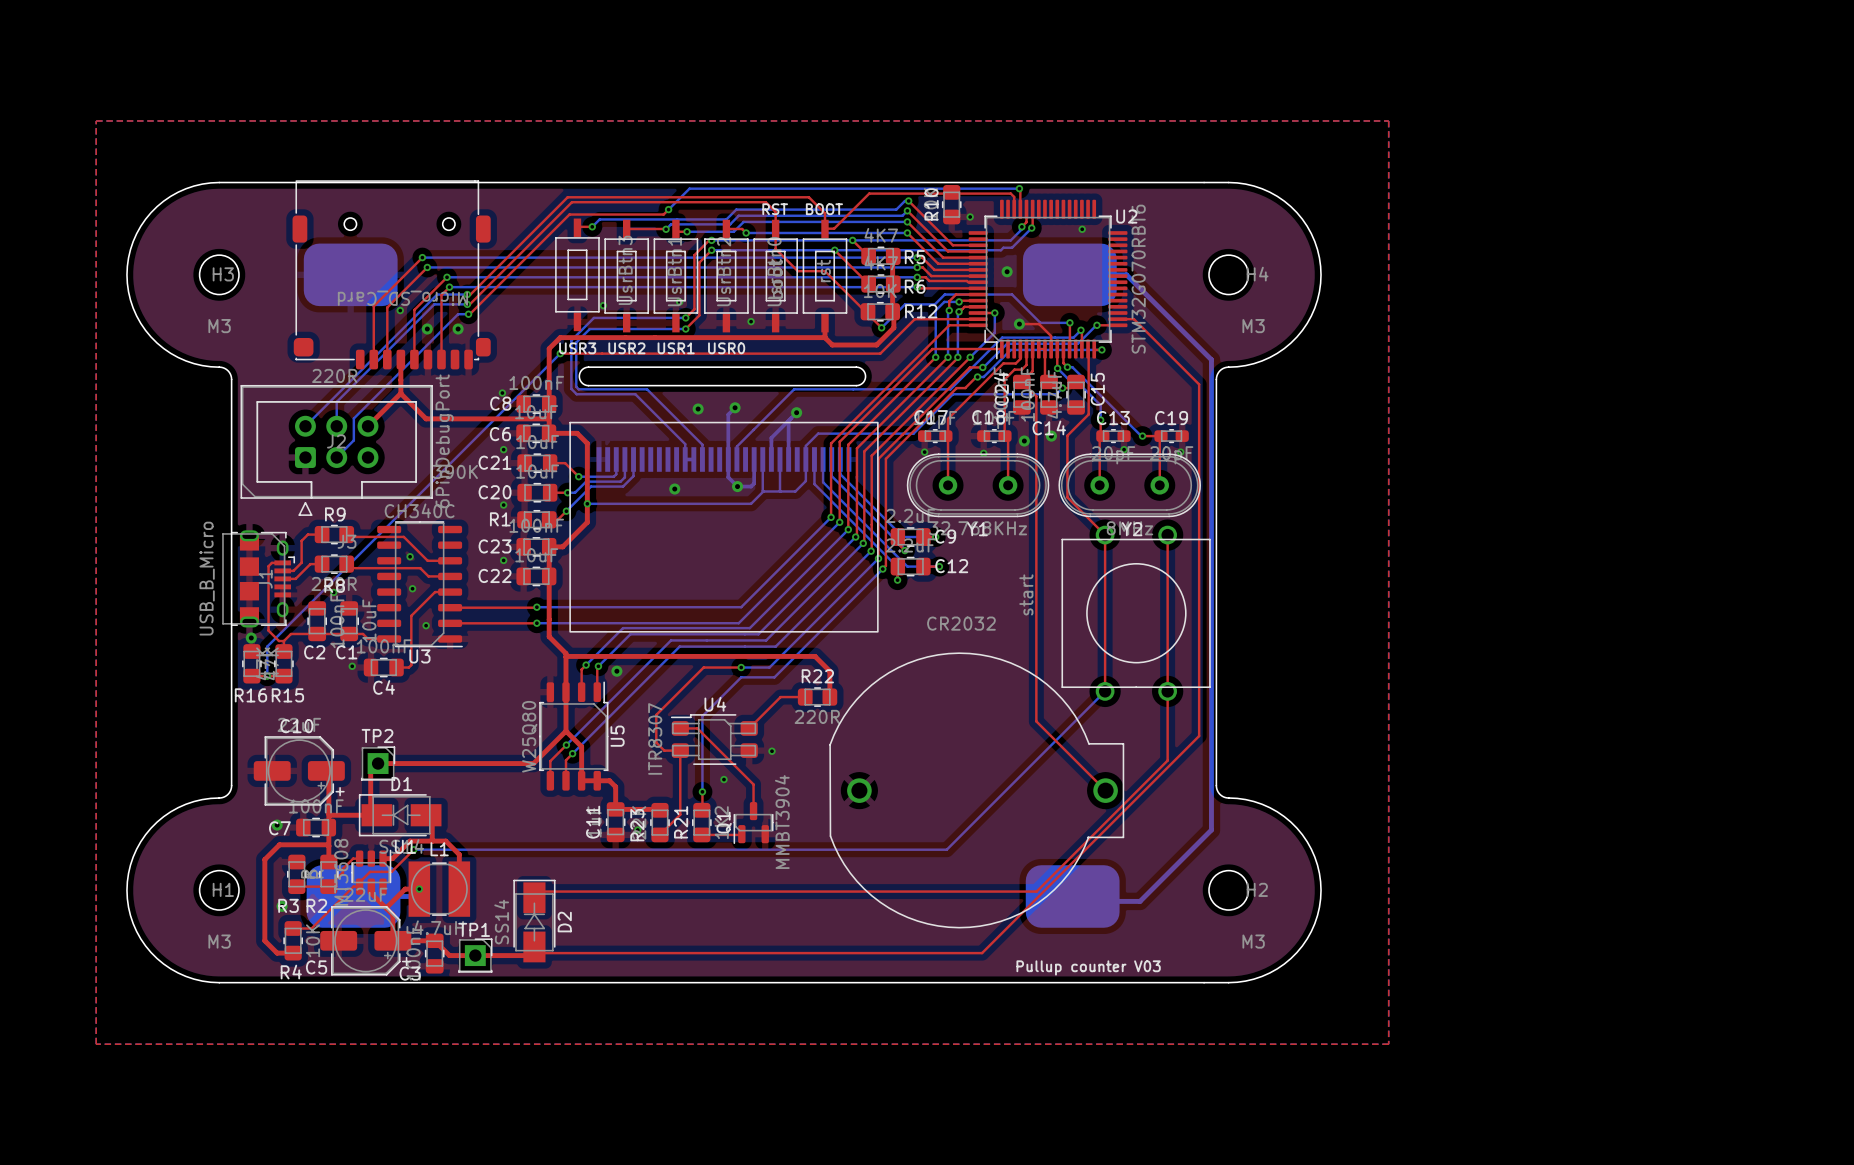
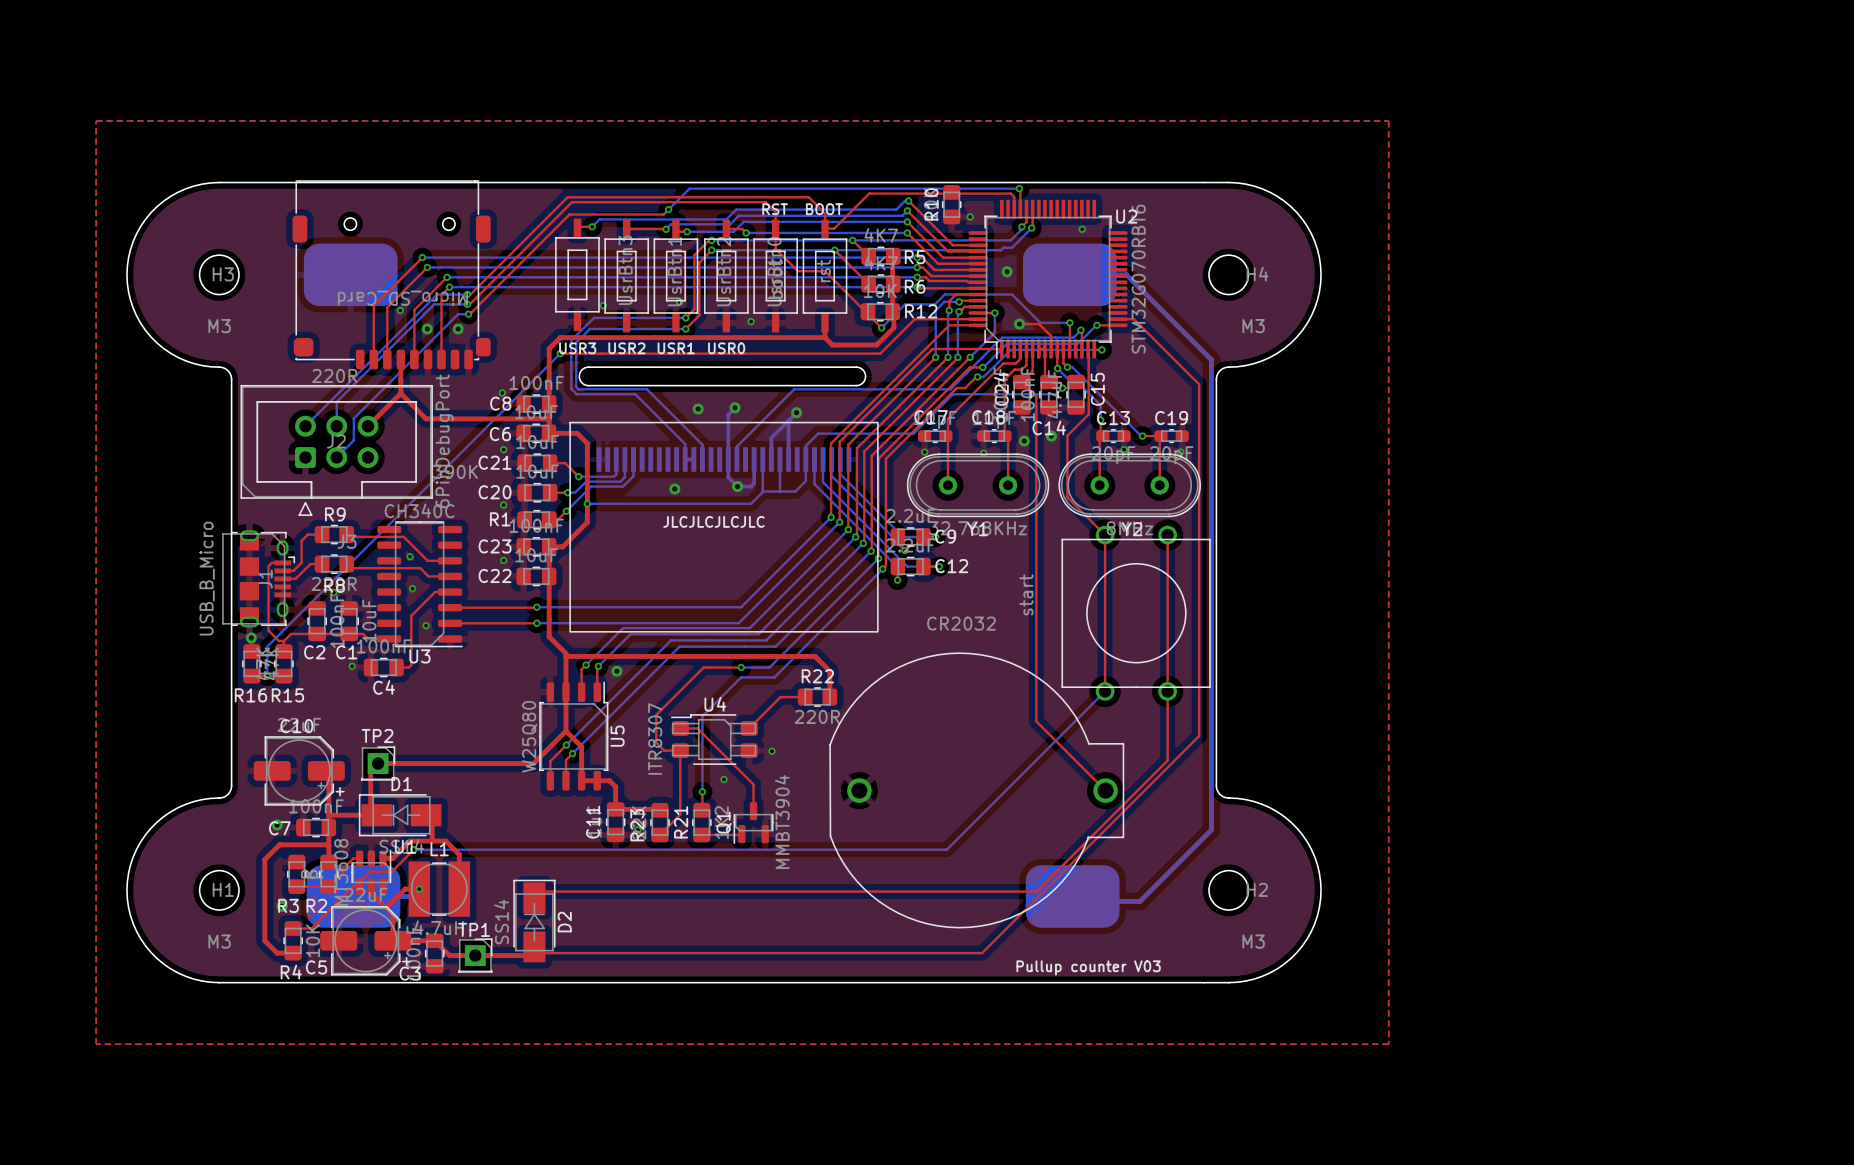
text: none -> JLCJLCJLCJLC (713, 521)

